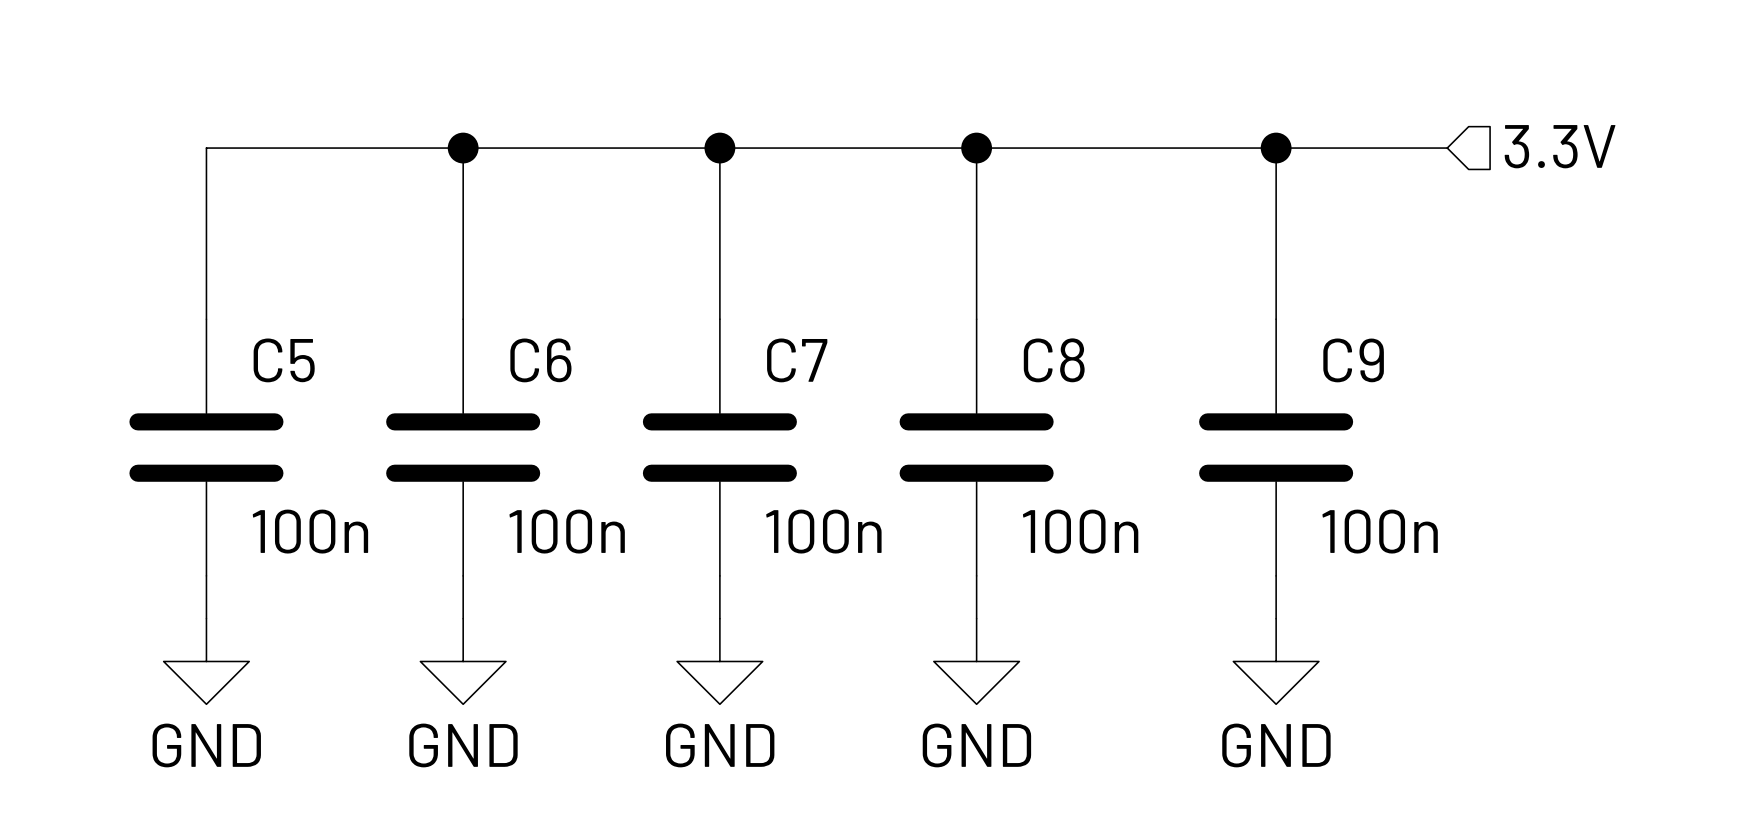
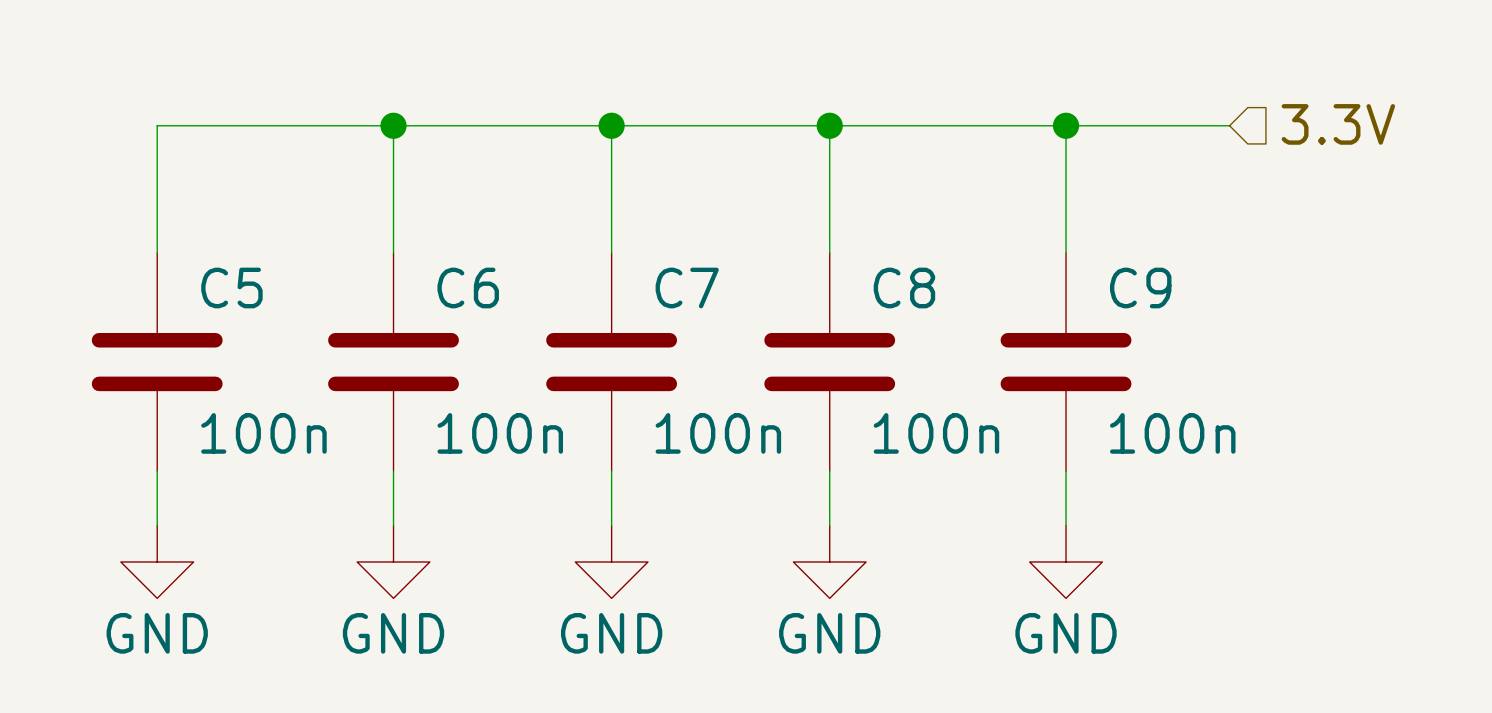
wire: (206, 148) (206, 319) -> (175, 125) (157, 125) (157, 253)
wire: none -> (1066, 125) (1066, 253)
wire: (1276, 148) (1276, 319) -> none
junction position: (1276, 148) -> (1066, 125)
C5 position: (206, 447) -> (157, 362)
C6 position: (463, 447) -> (393, 362)
C7 position: (719, 447) -> (611, 362)
C8 position: (976, 447) -> (829, 362)
C9 position: (1276, 447) -> (1066, 362)
wire: none -> (157, 471) (157, 525)
wire: none -> (1066, 471) (1066, 525)
wire: (206, 575) (206, 618) -> none
wire: (1276, 575) (1276, 618) -> none
power symbol position: GND (206, 661) -> GND (157, 562)
power symbol position: GND (1276, 661) -> GND (1066, 562)

